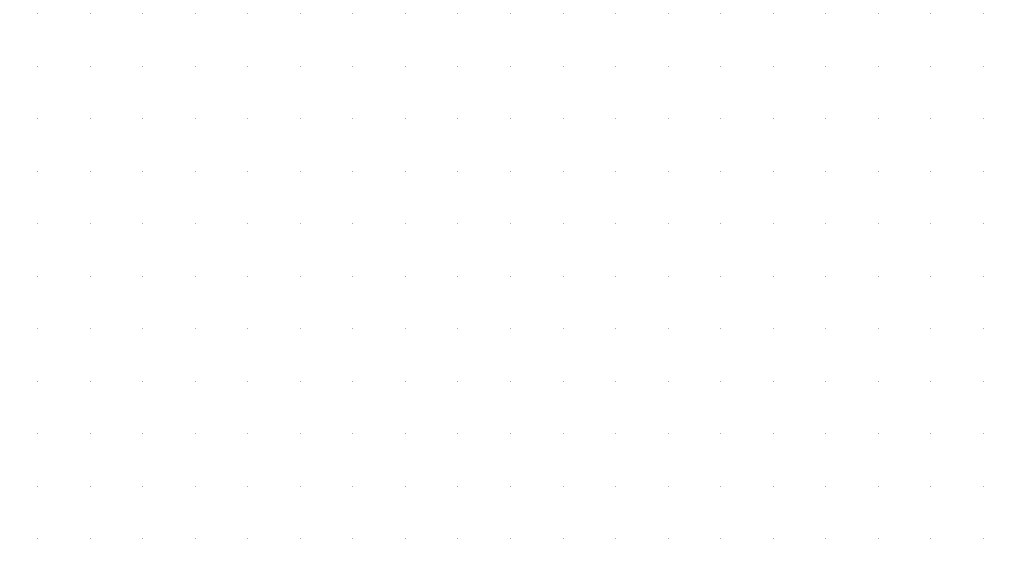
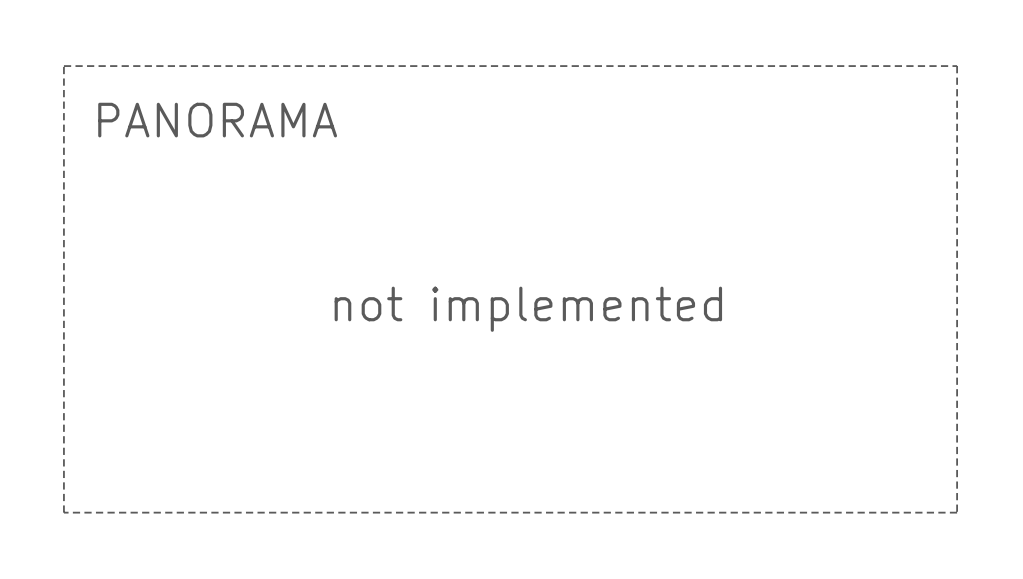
line: none -> (63, 66) (957, 66) (957, 512) (63, 512) (63, 66)
text: none -> PANORAMA (217, 120)
text: none -> not implemented (528, 309)

